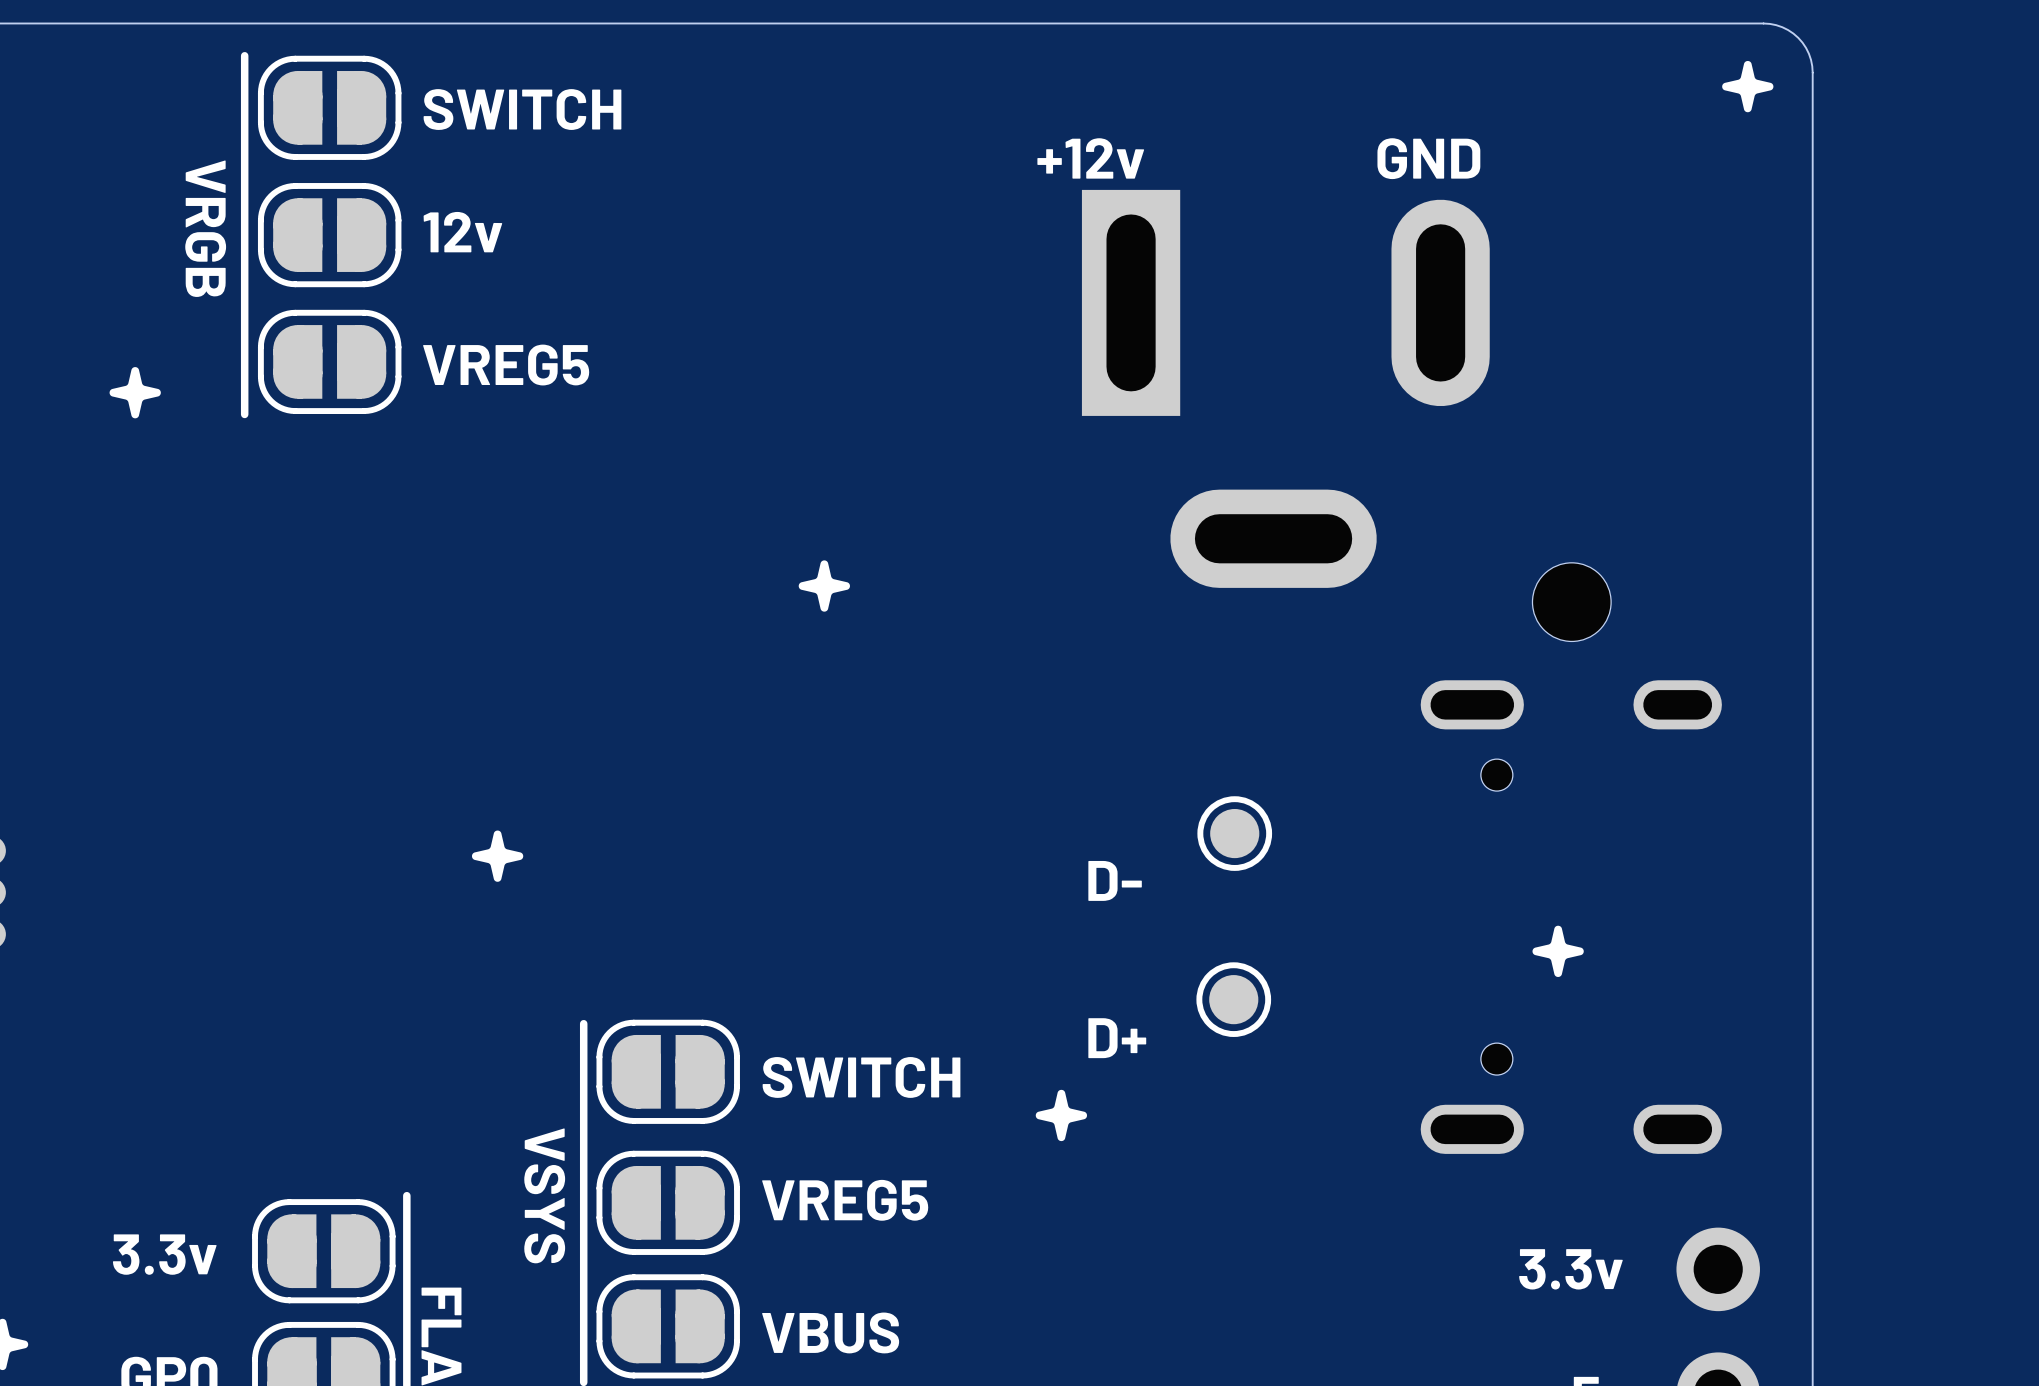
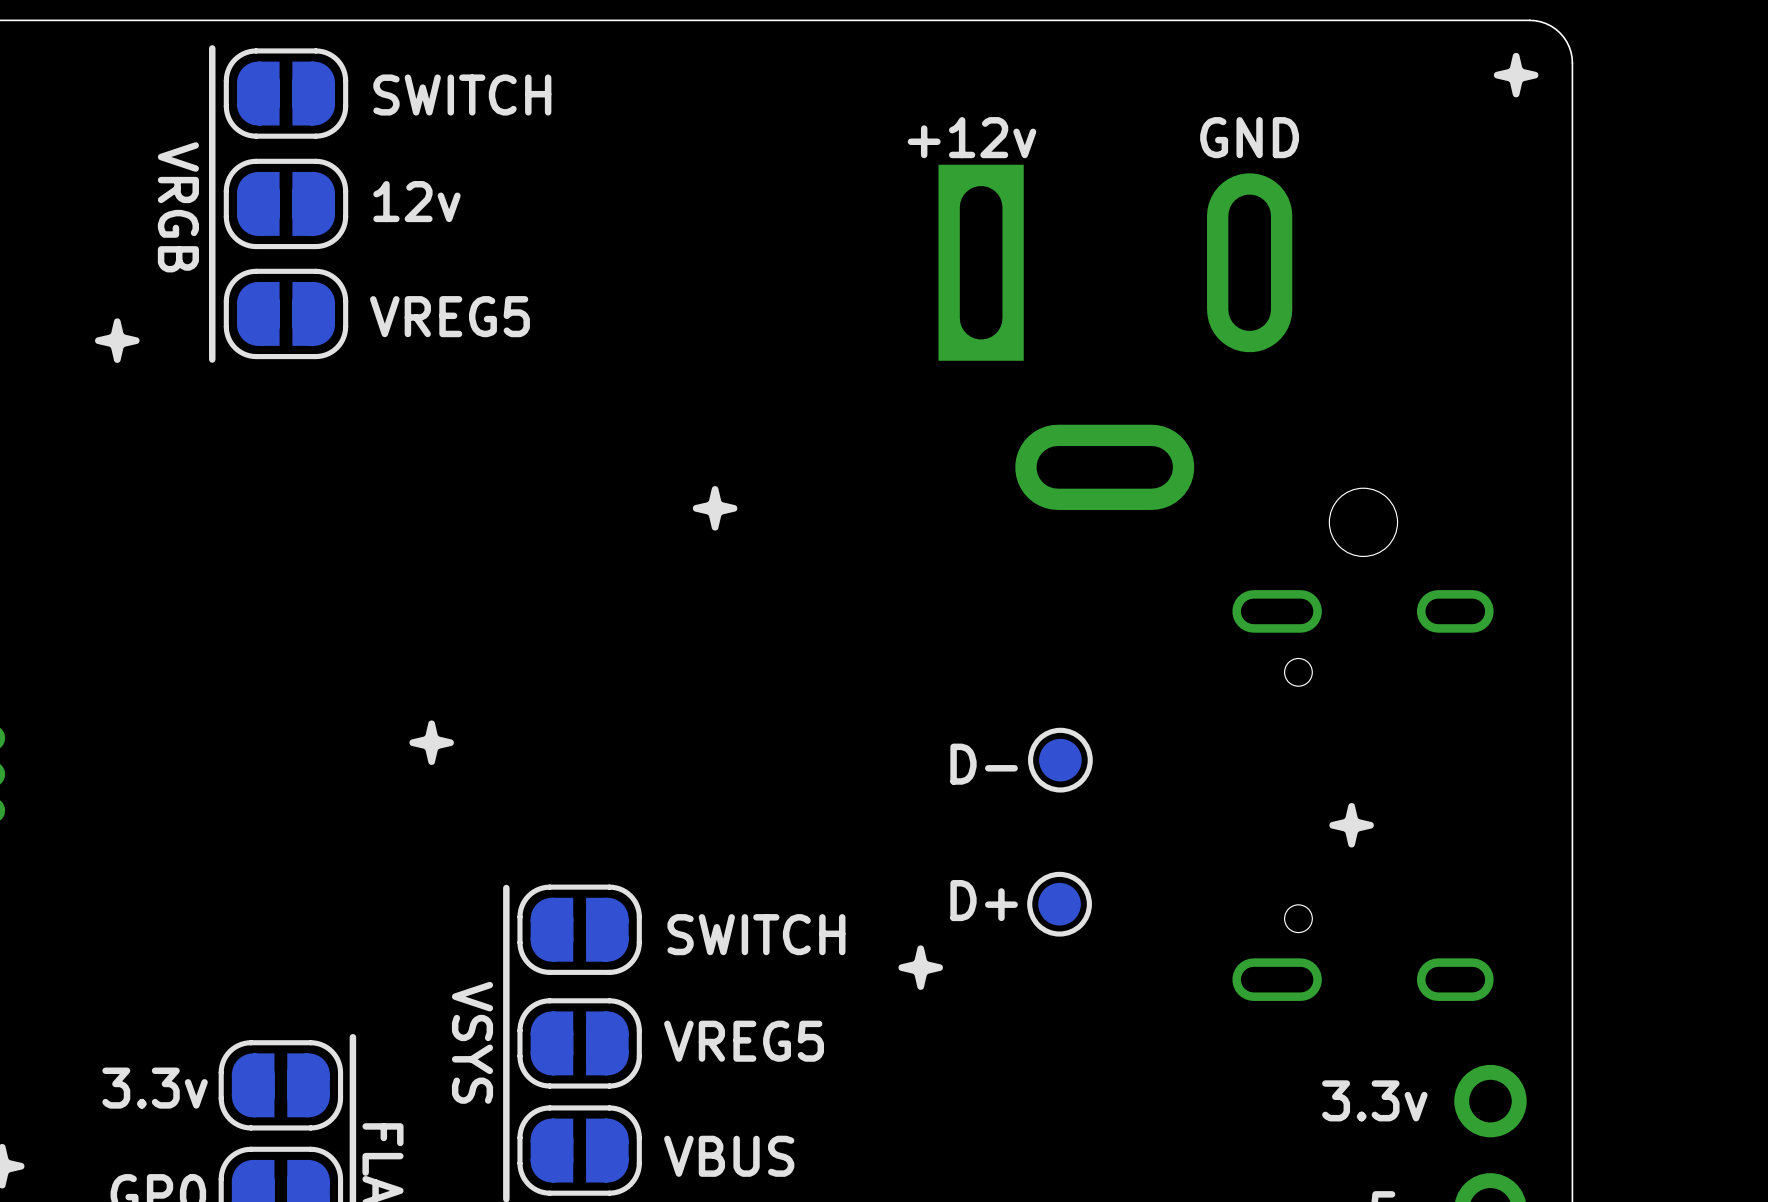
part position: (1234, 833) -> (1060, 760)
part position: (1233, 999) -> (1059, 904)

